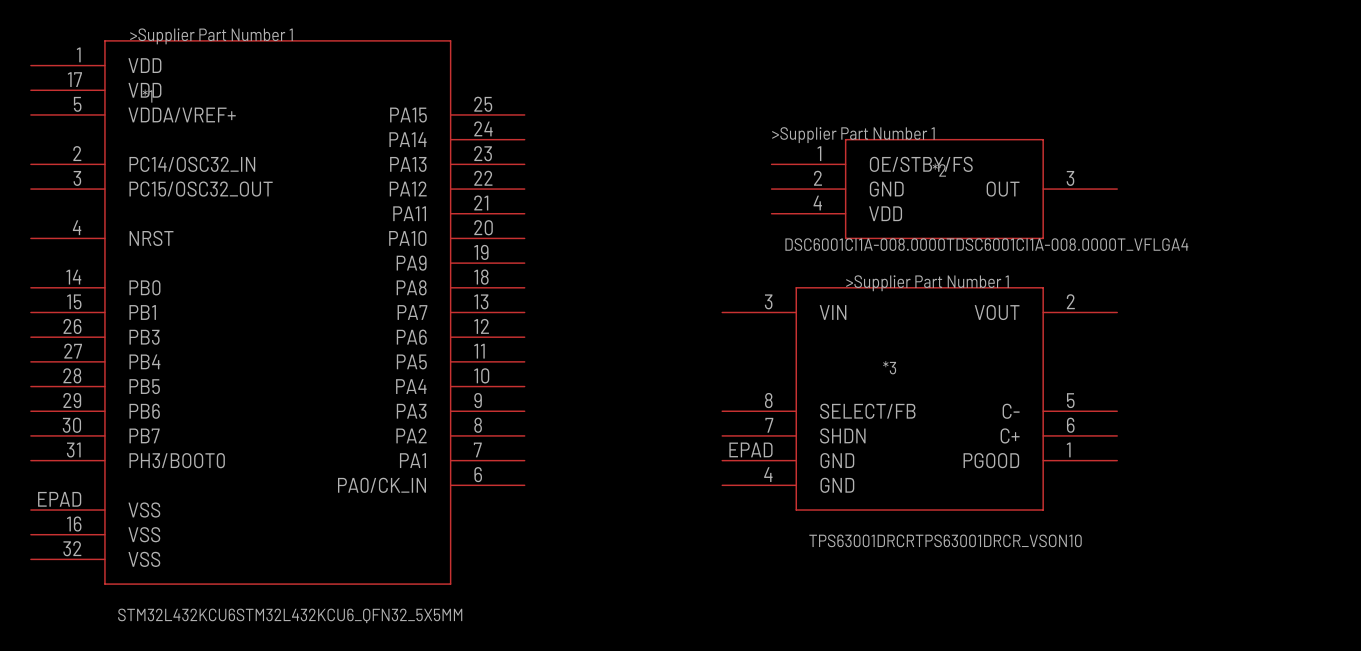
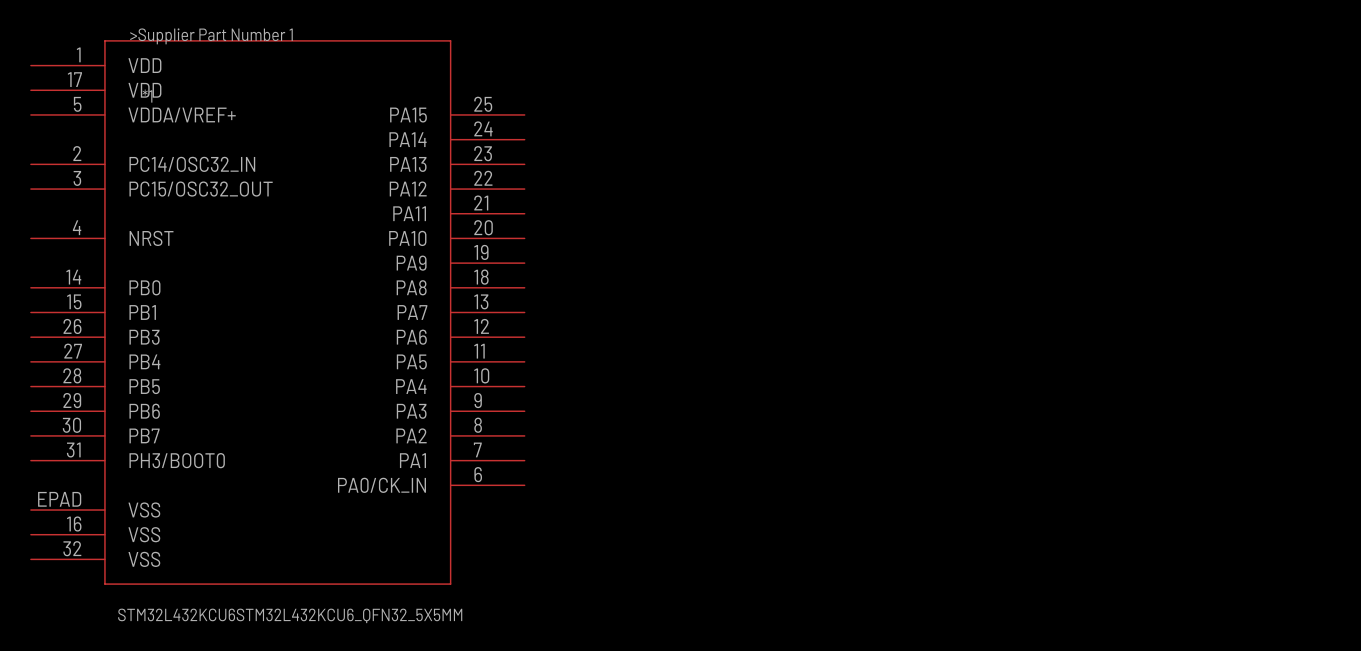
*2: DSC6001CI1A-008.0000TDSC6001CI1A-008.0000T_VFLGA4 (944, 189) -> none
*3: TPS63001DRCRTPS63001DRCR_VSON10 (919, 398) -> none

